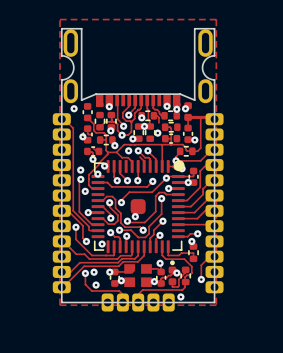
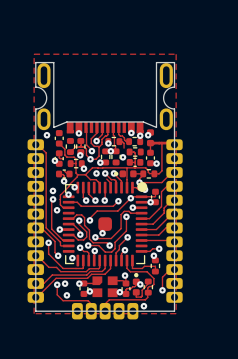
part: none -> (125, 173)
track: none -> (133, 173) (143, 174)

